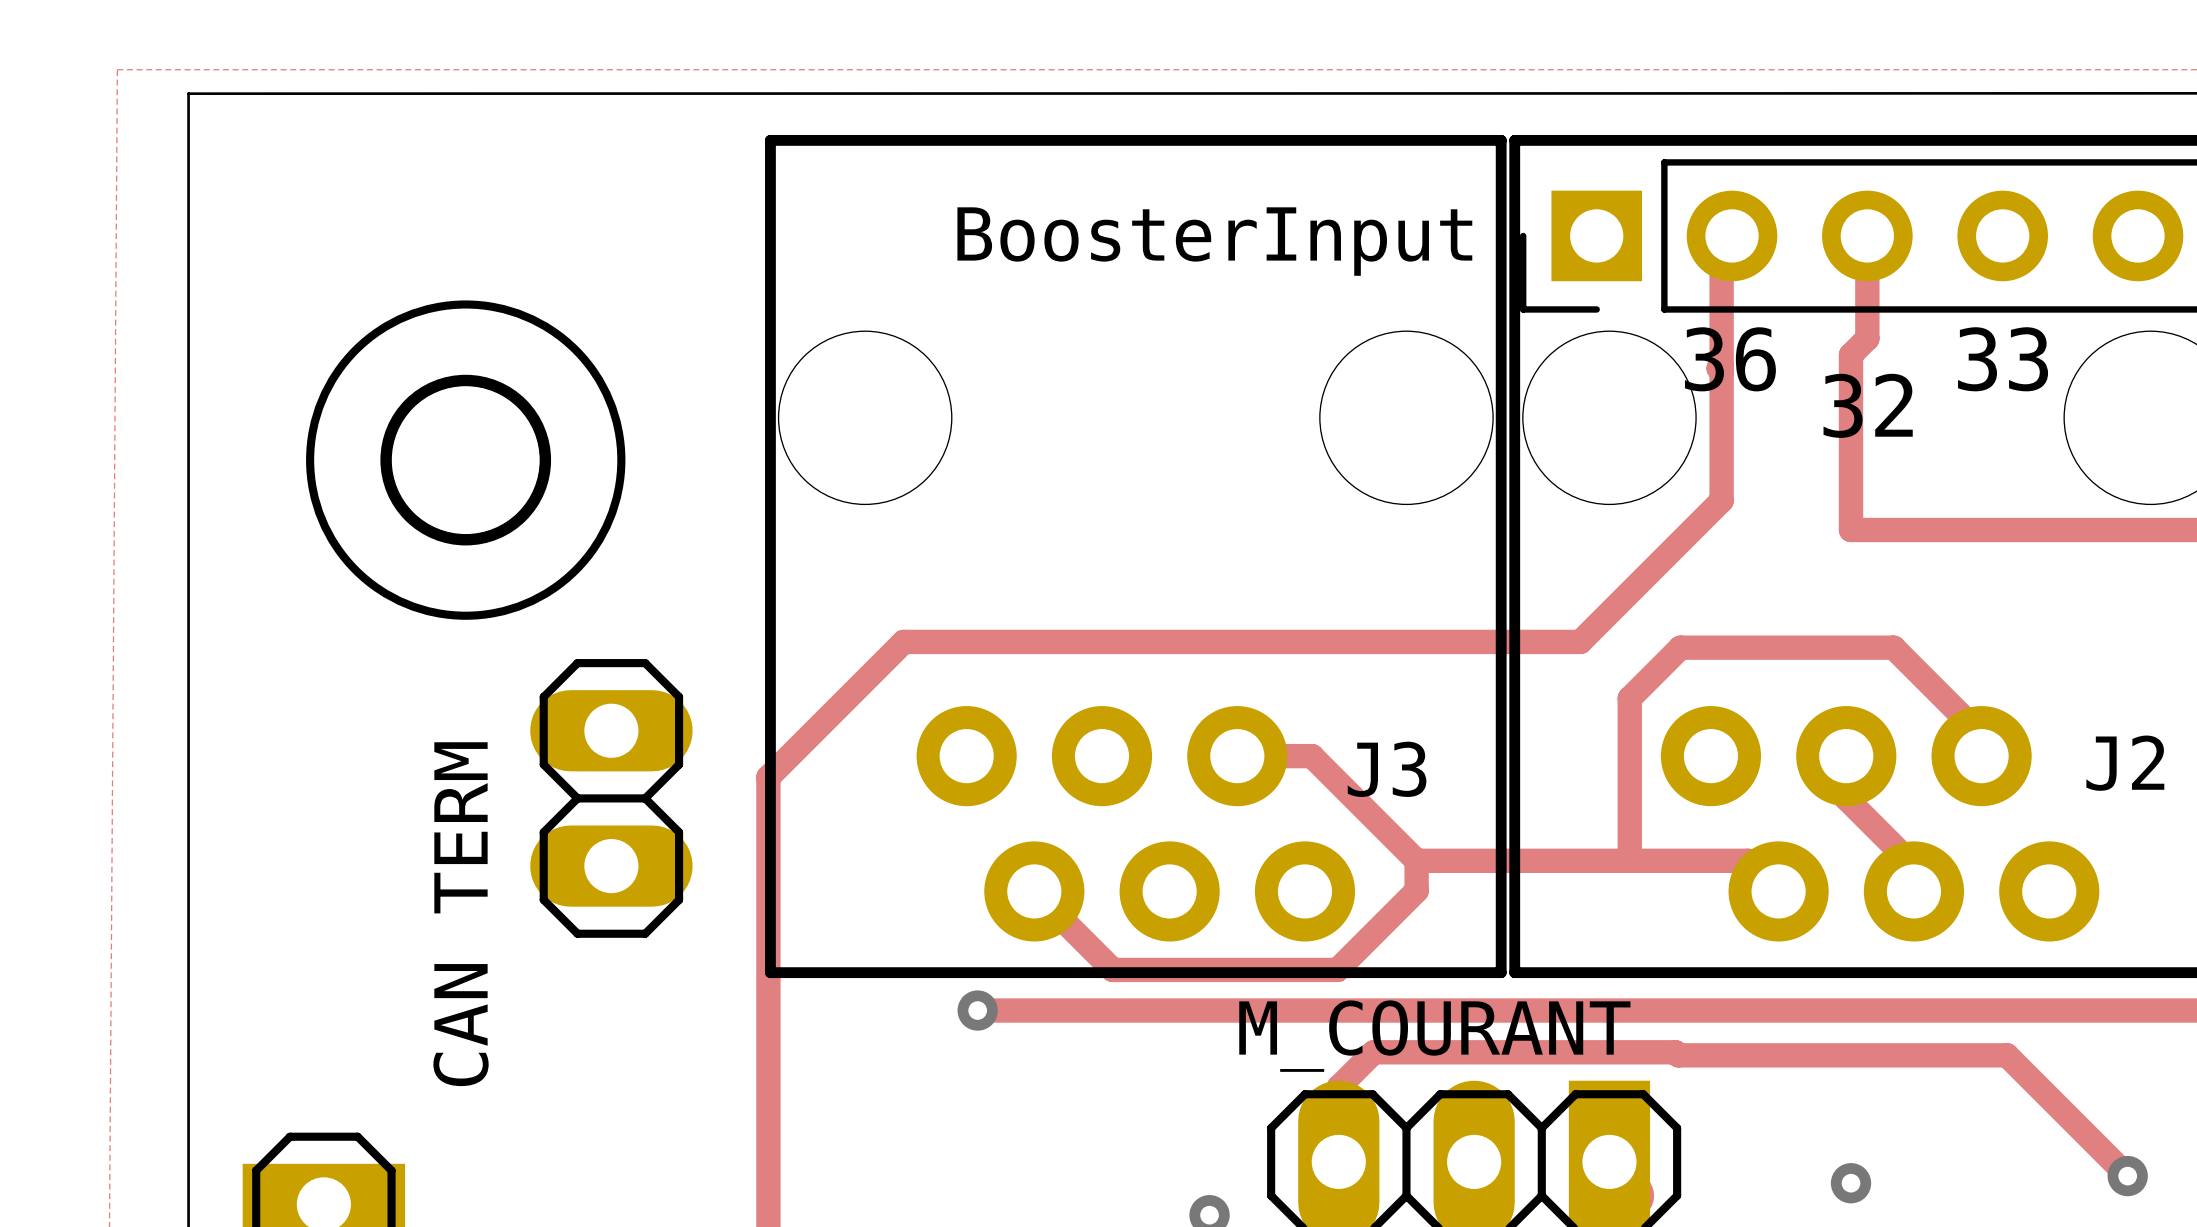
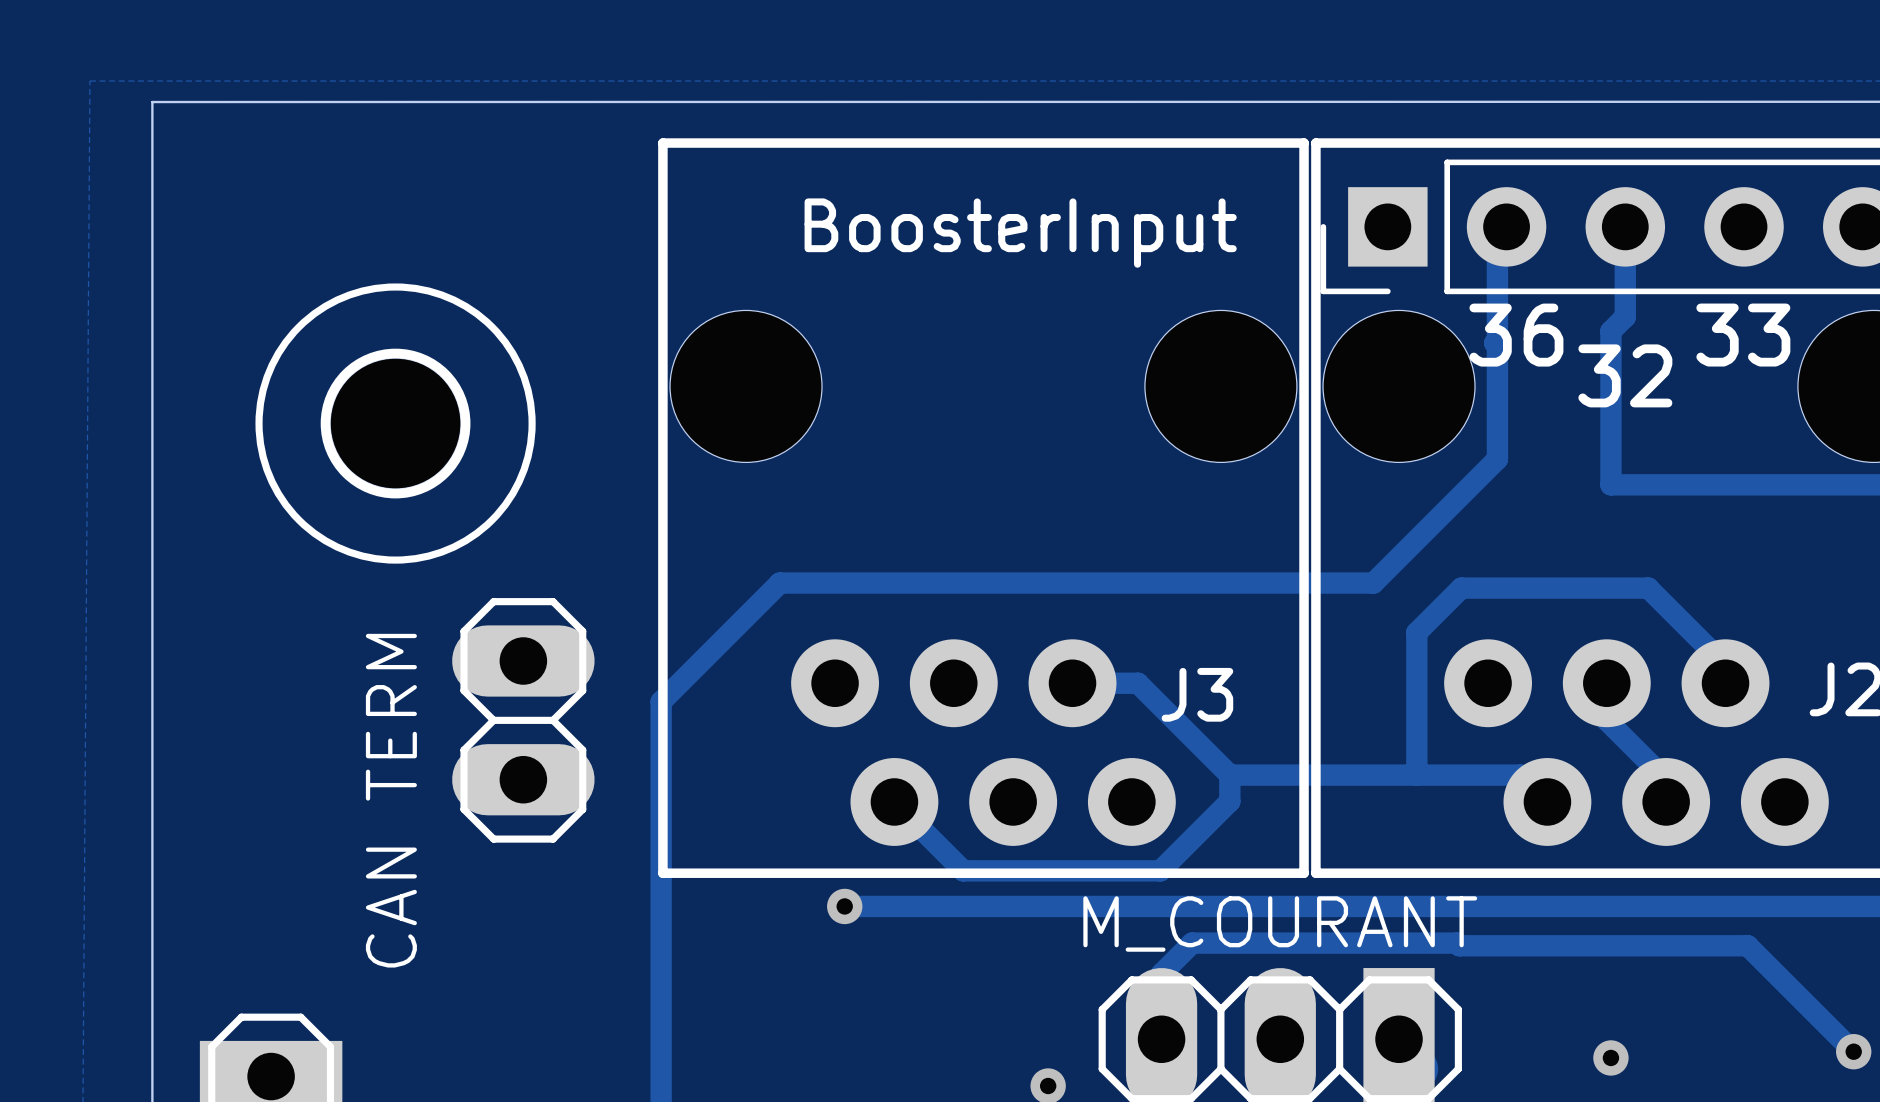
part value position: BoosterInput (1214, 241) -> BoosterInput (1020, 233)

